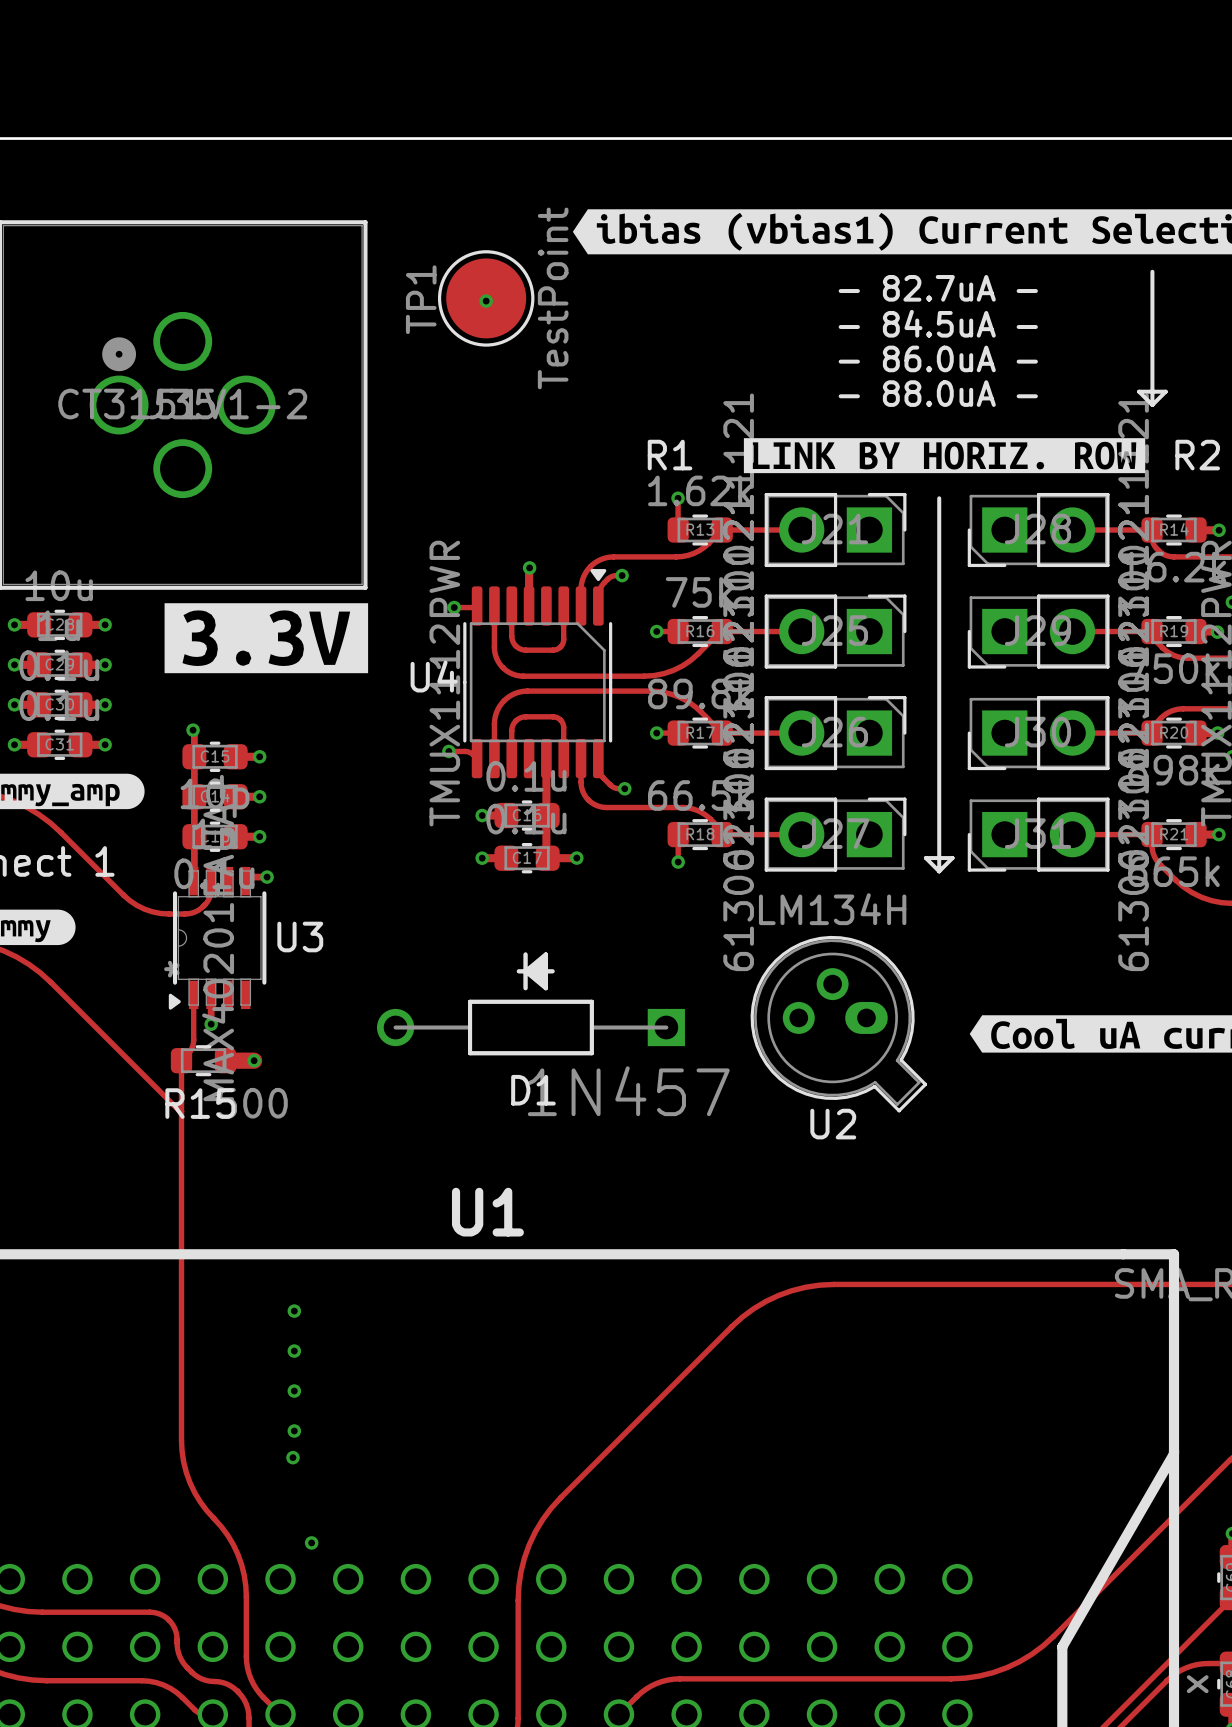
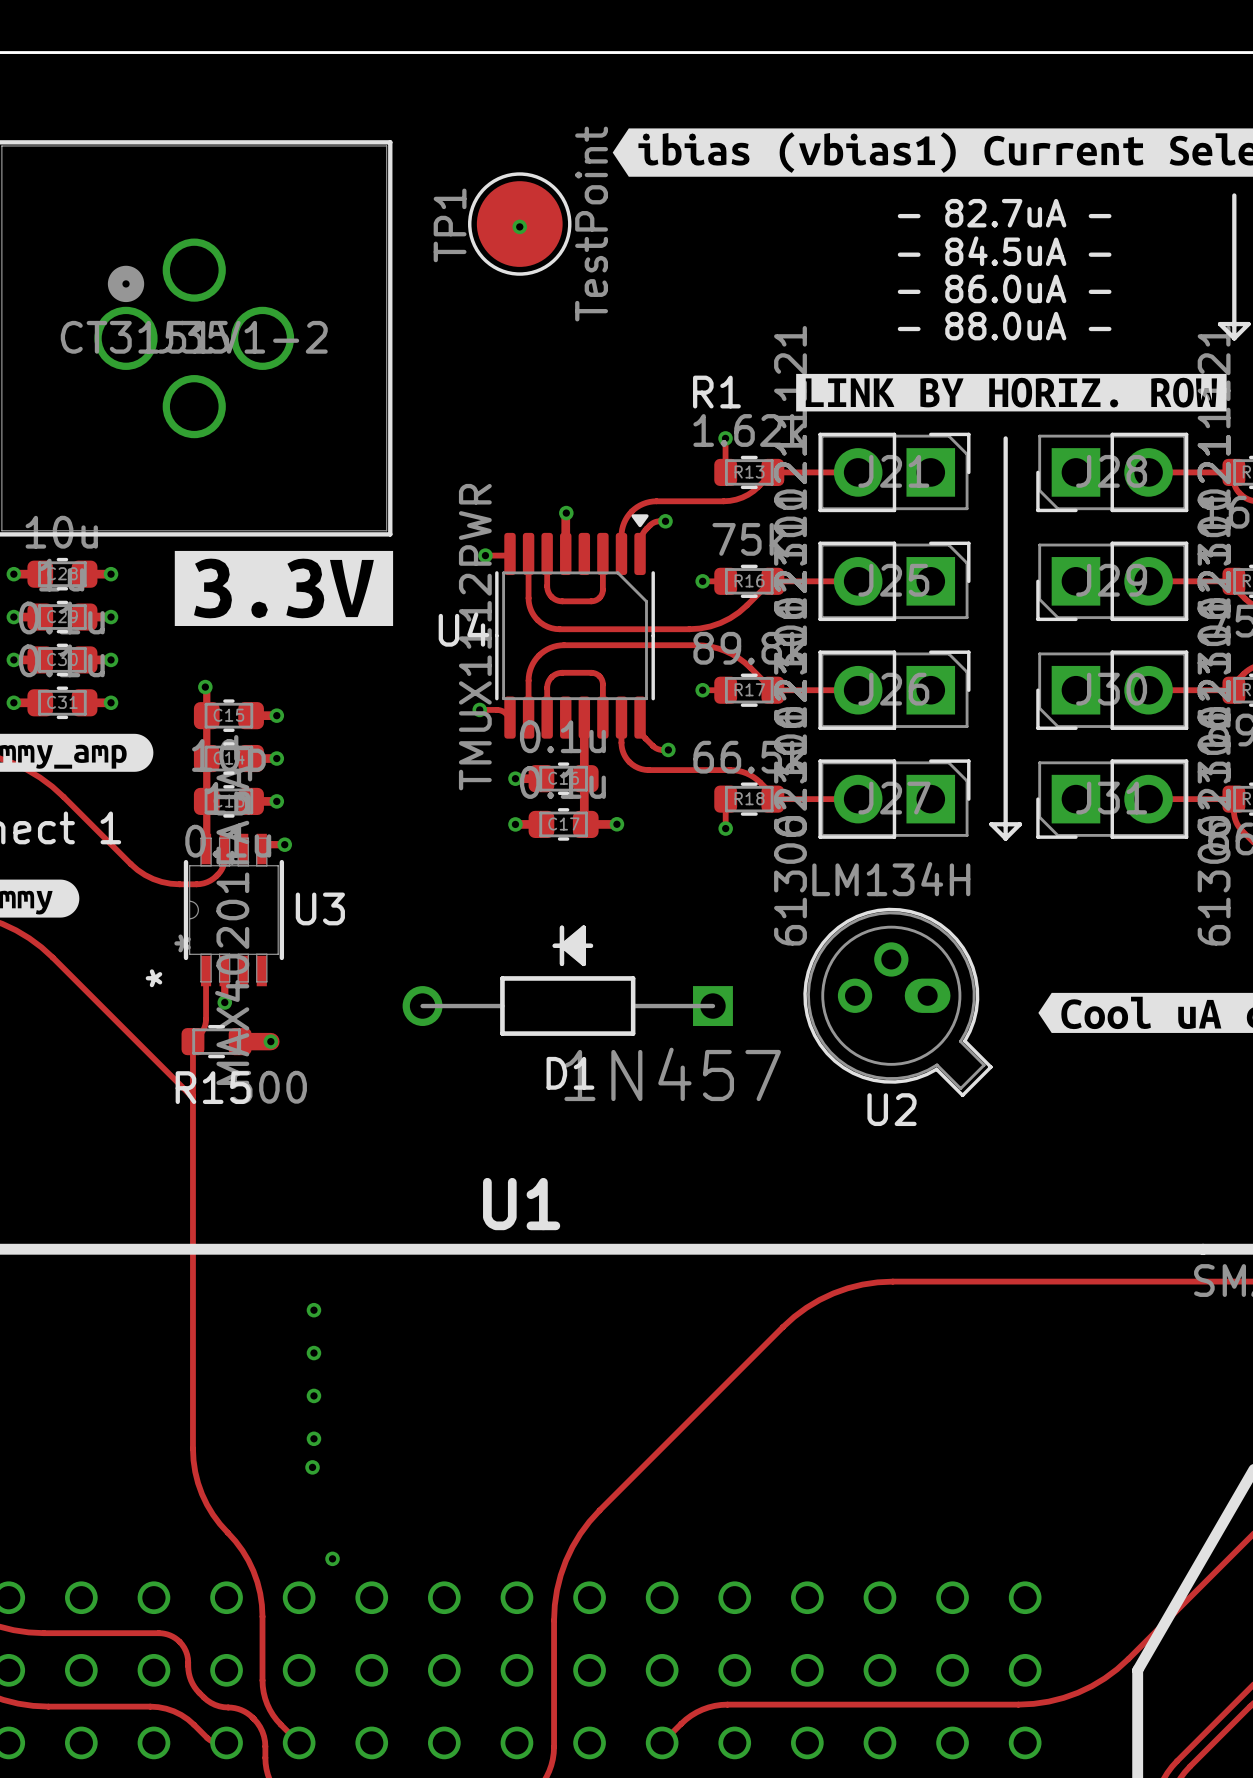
U3 footprint: [168, 866, 267, 1010] -> [183, 833, 285, 987]

